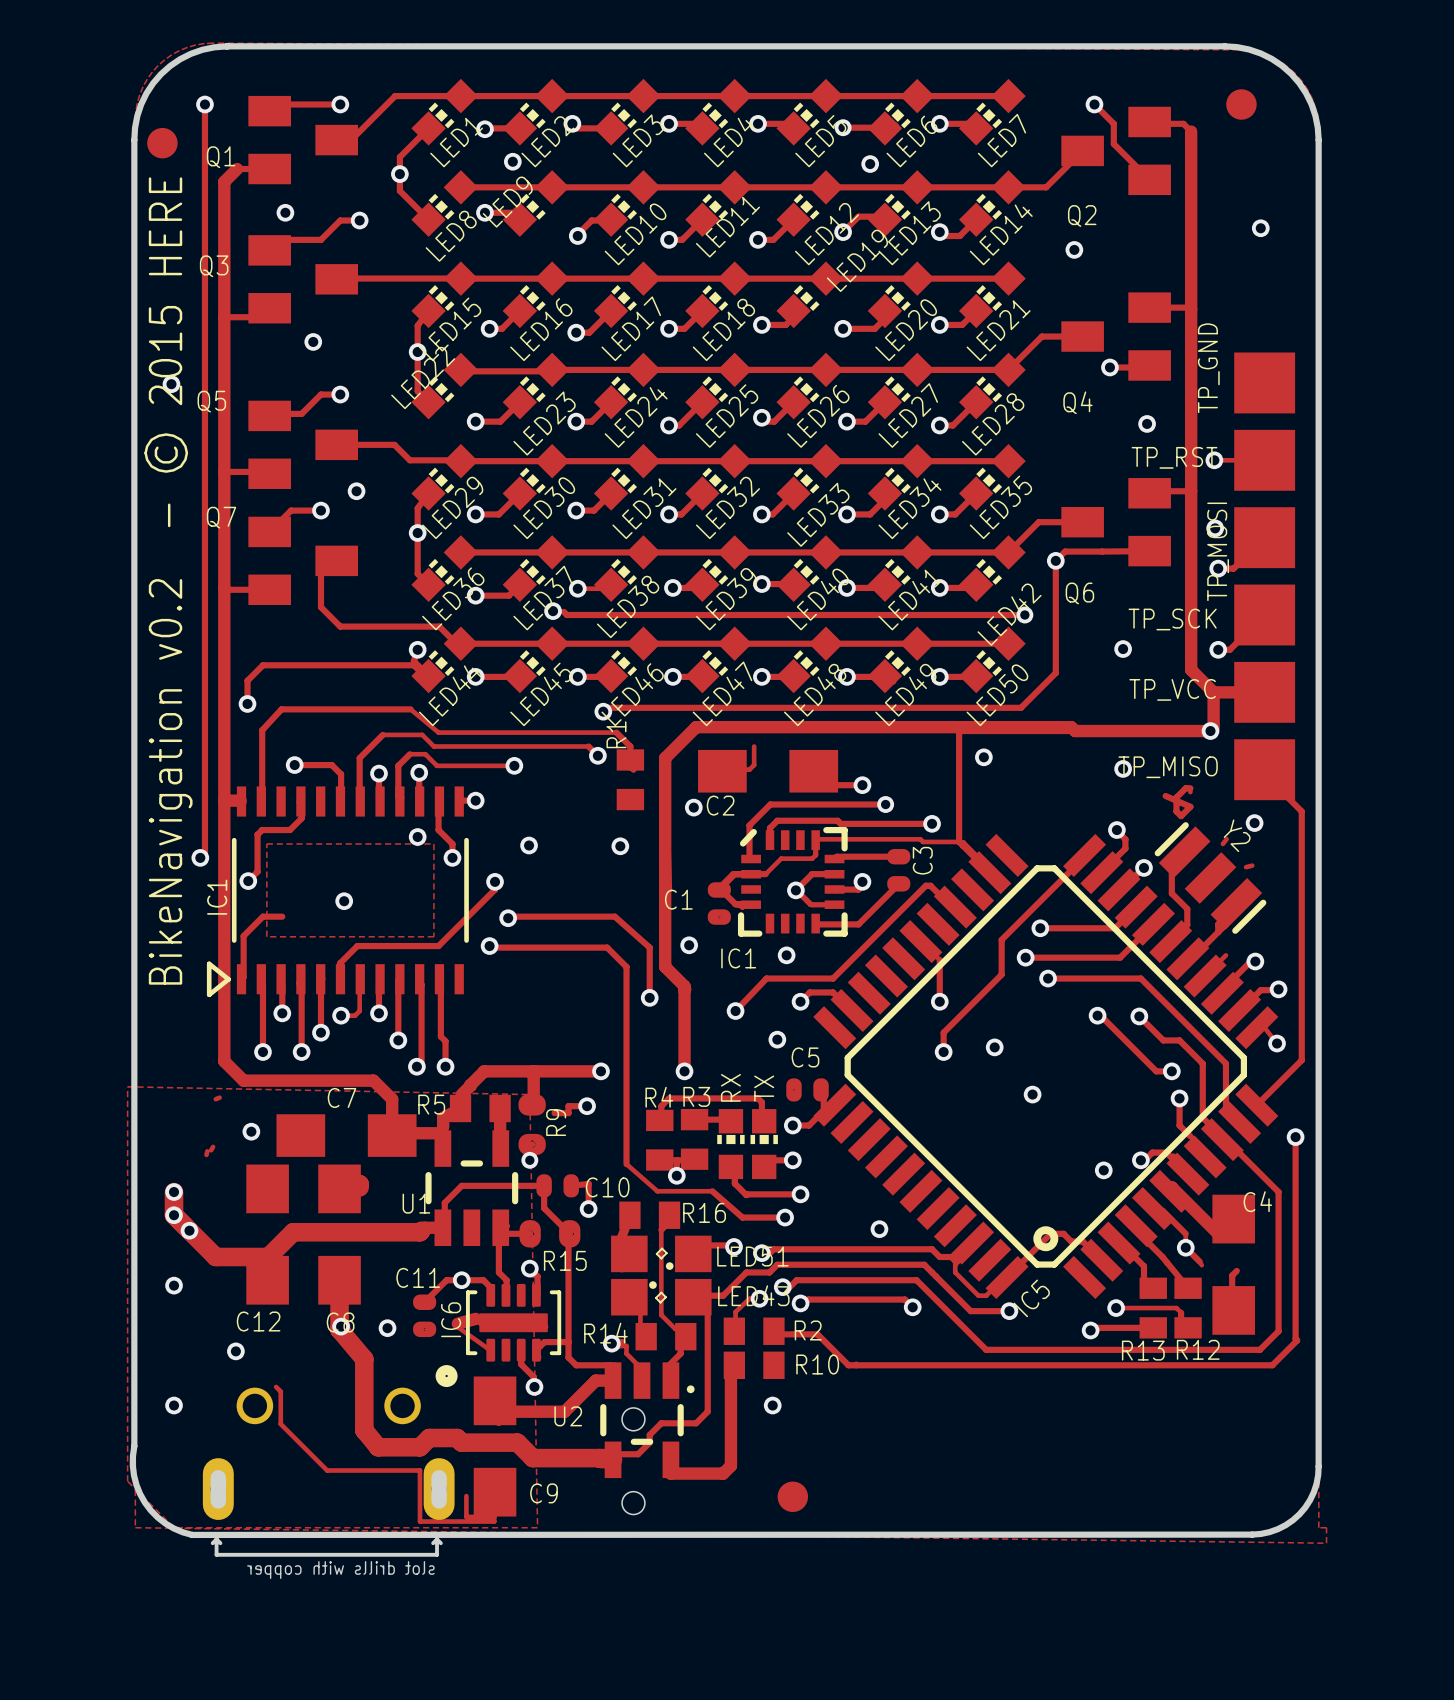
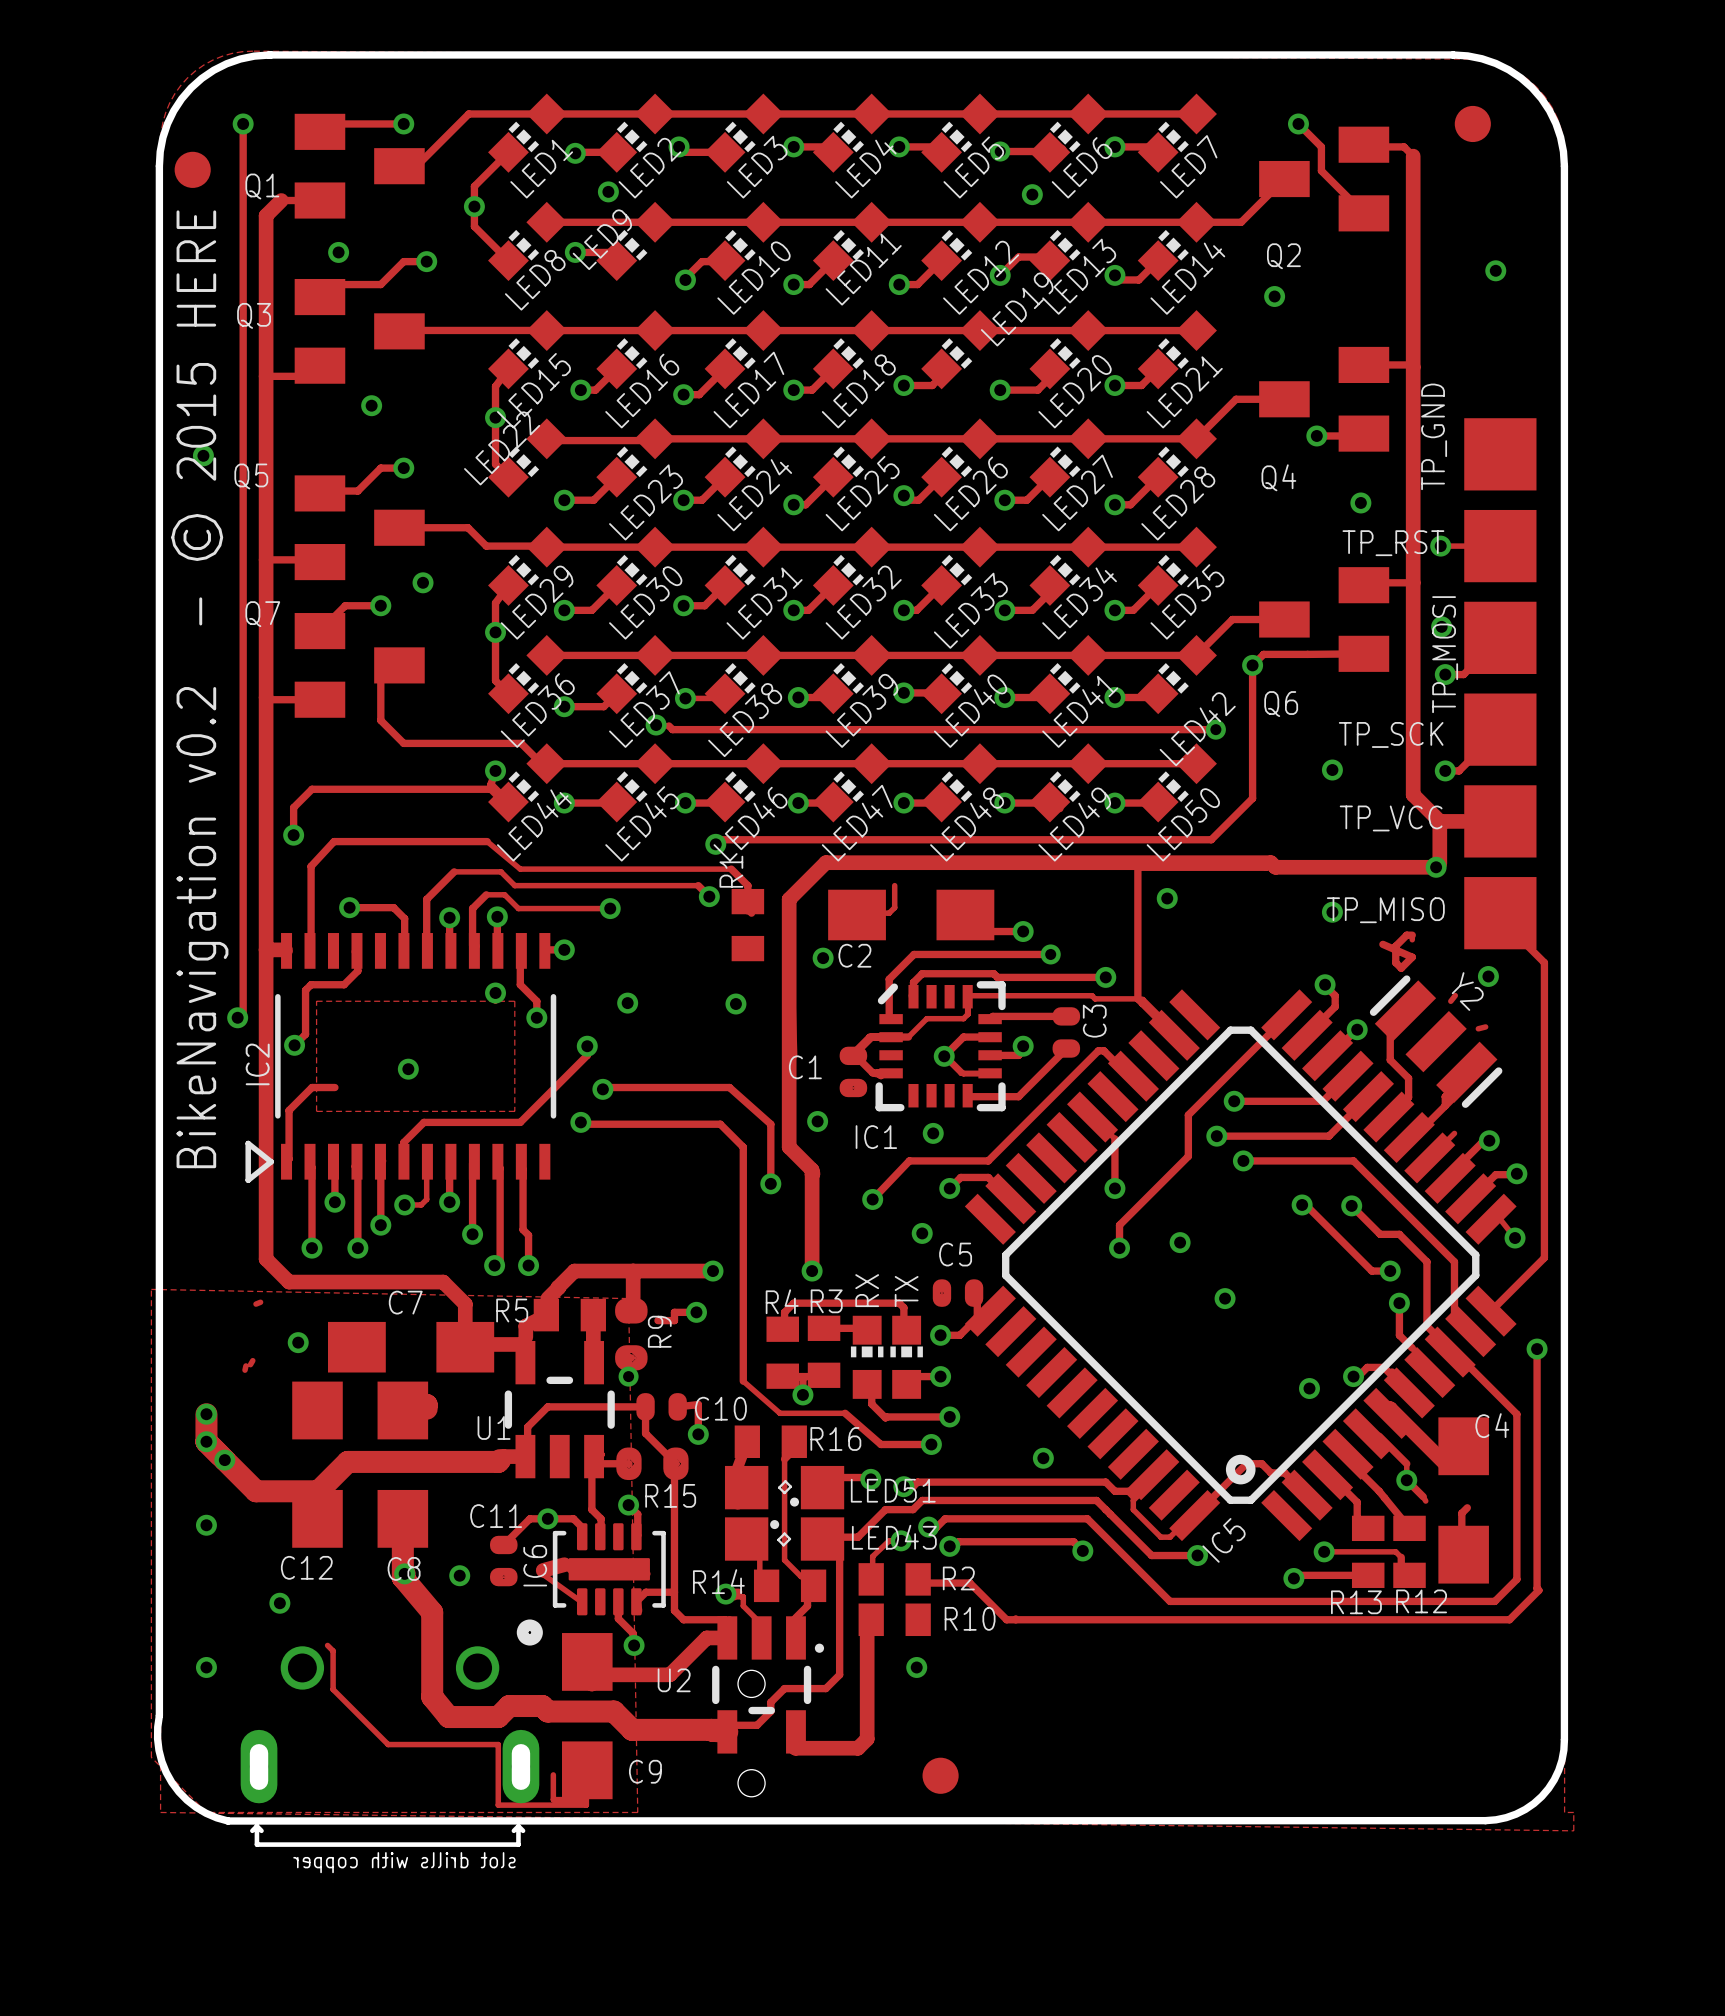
IC1 name: IC1 (217, 897) -> IC2 (257, 1064)

